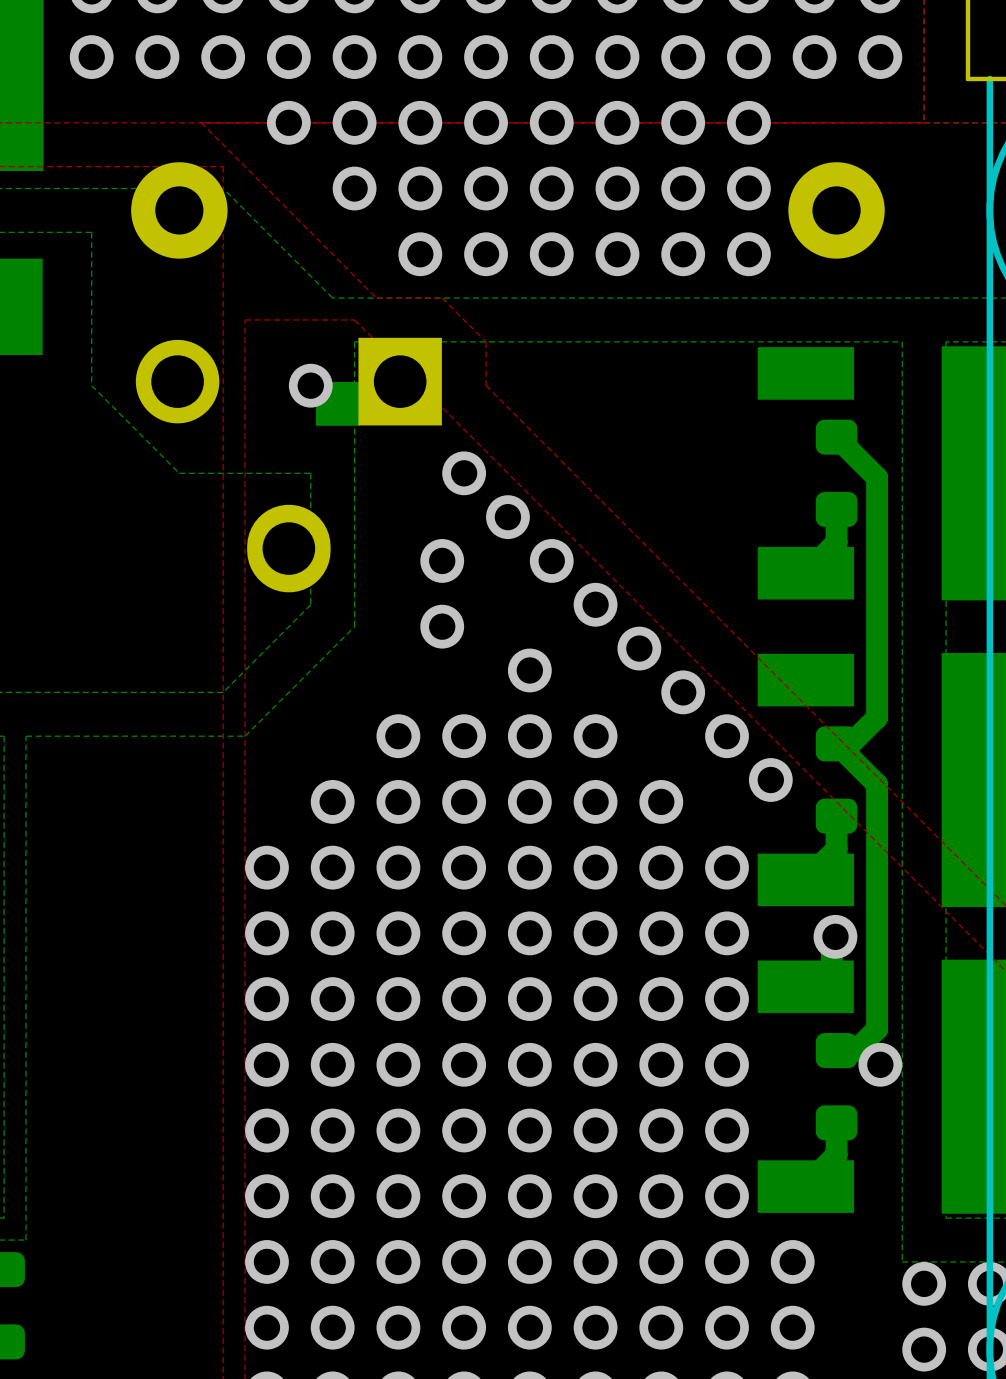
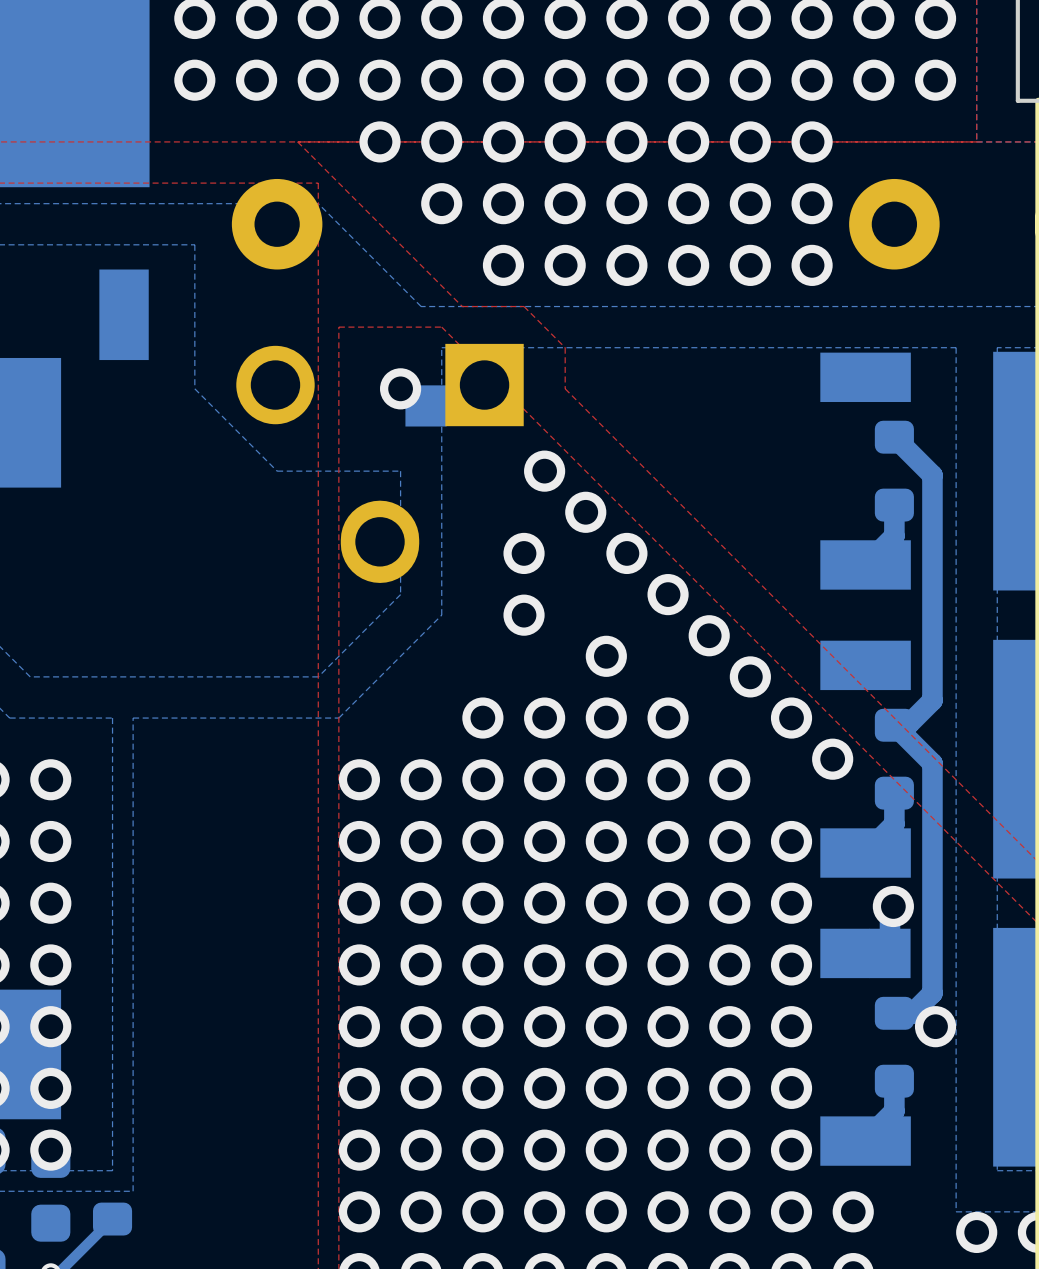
via: none -> (359, 779)

